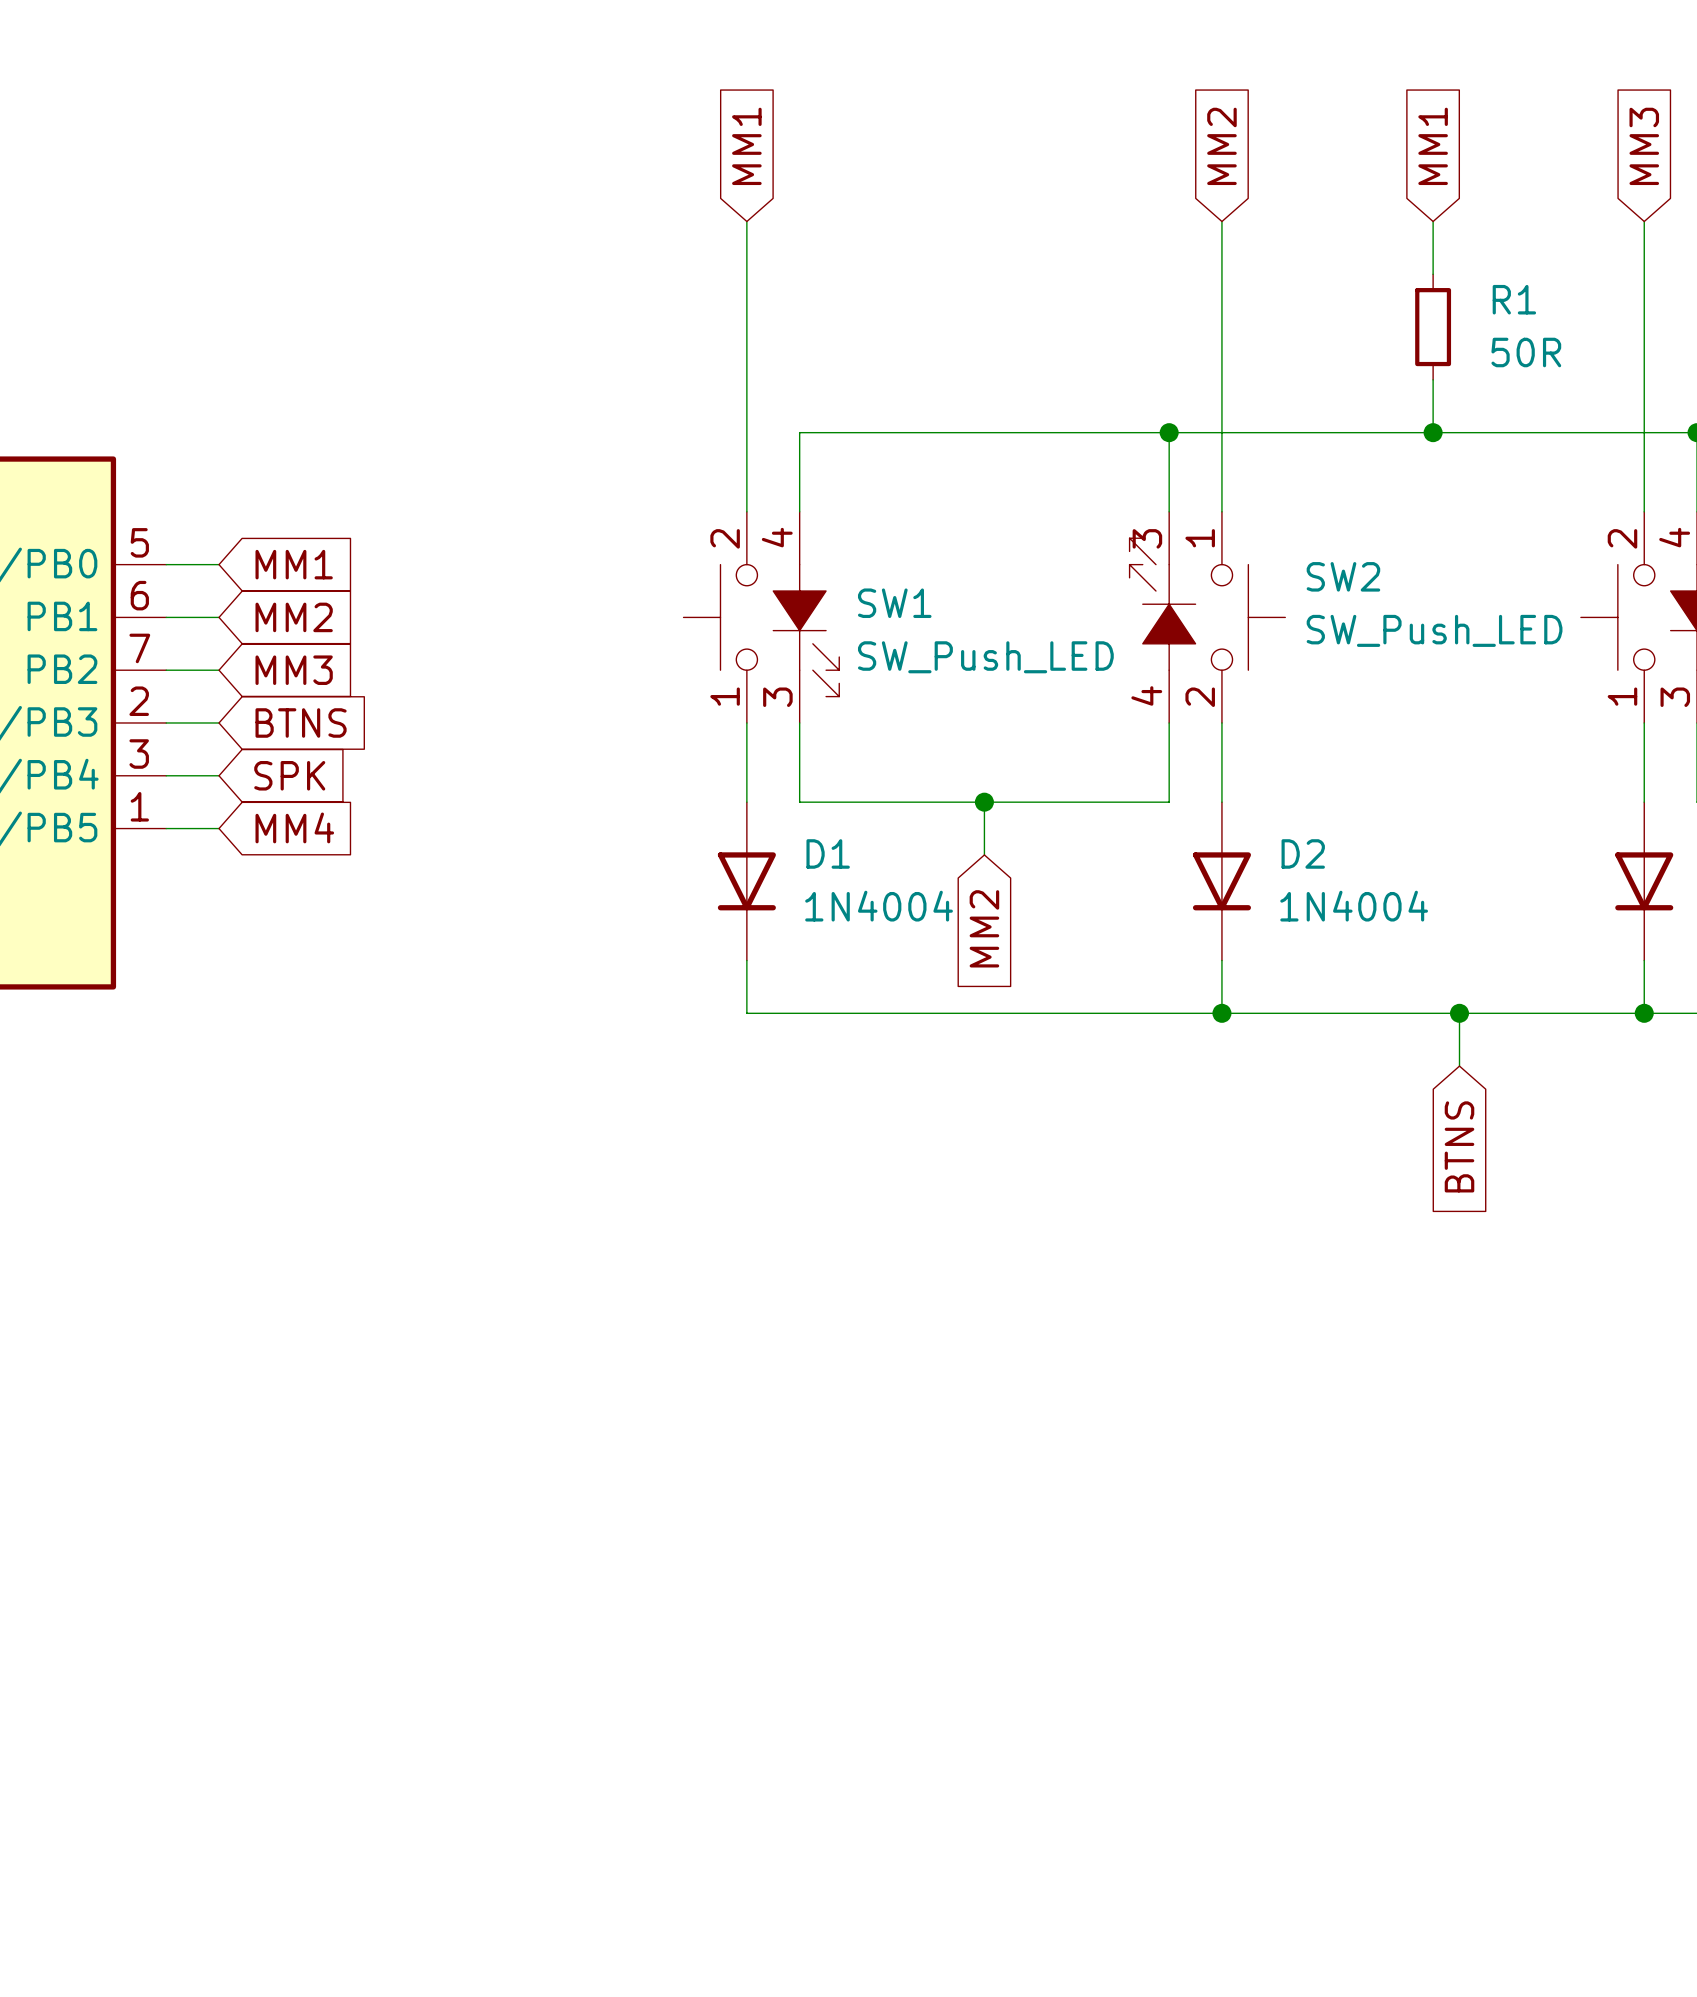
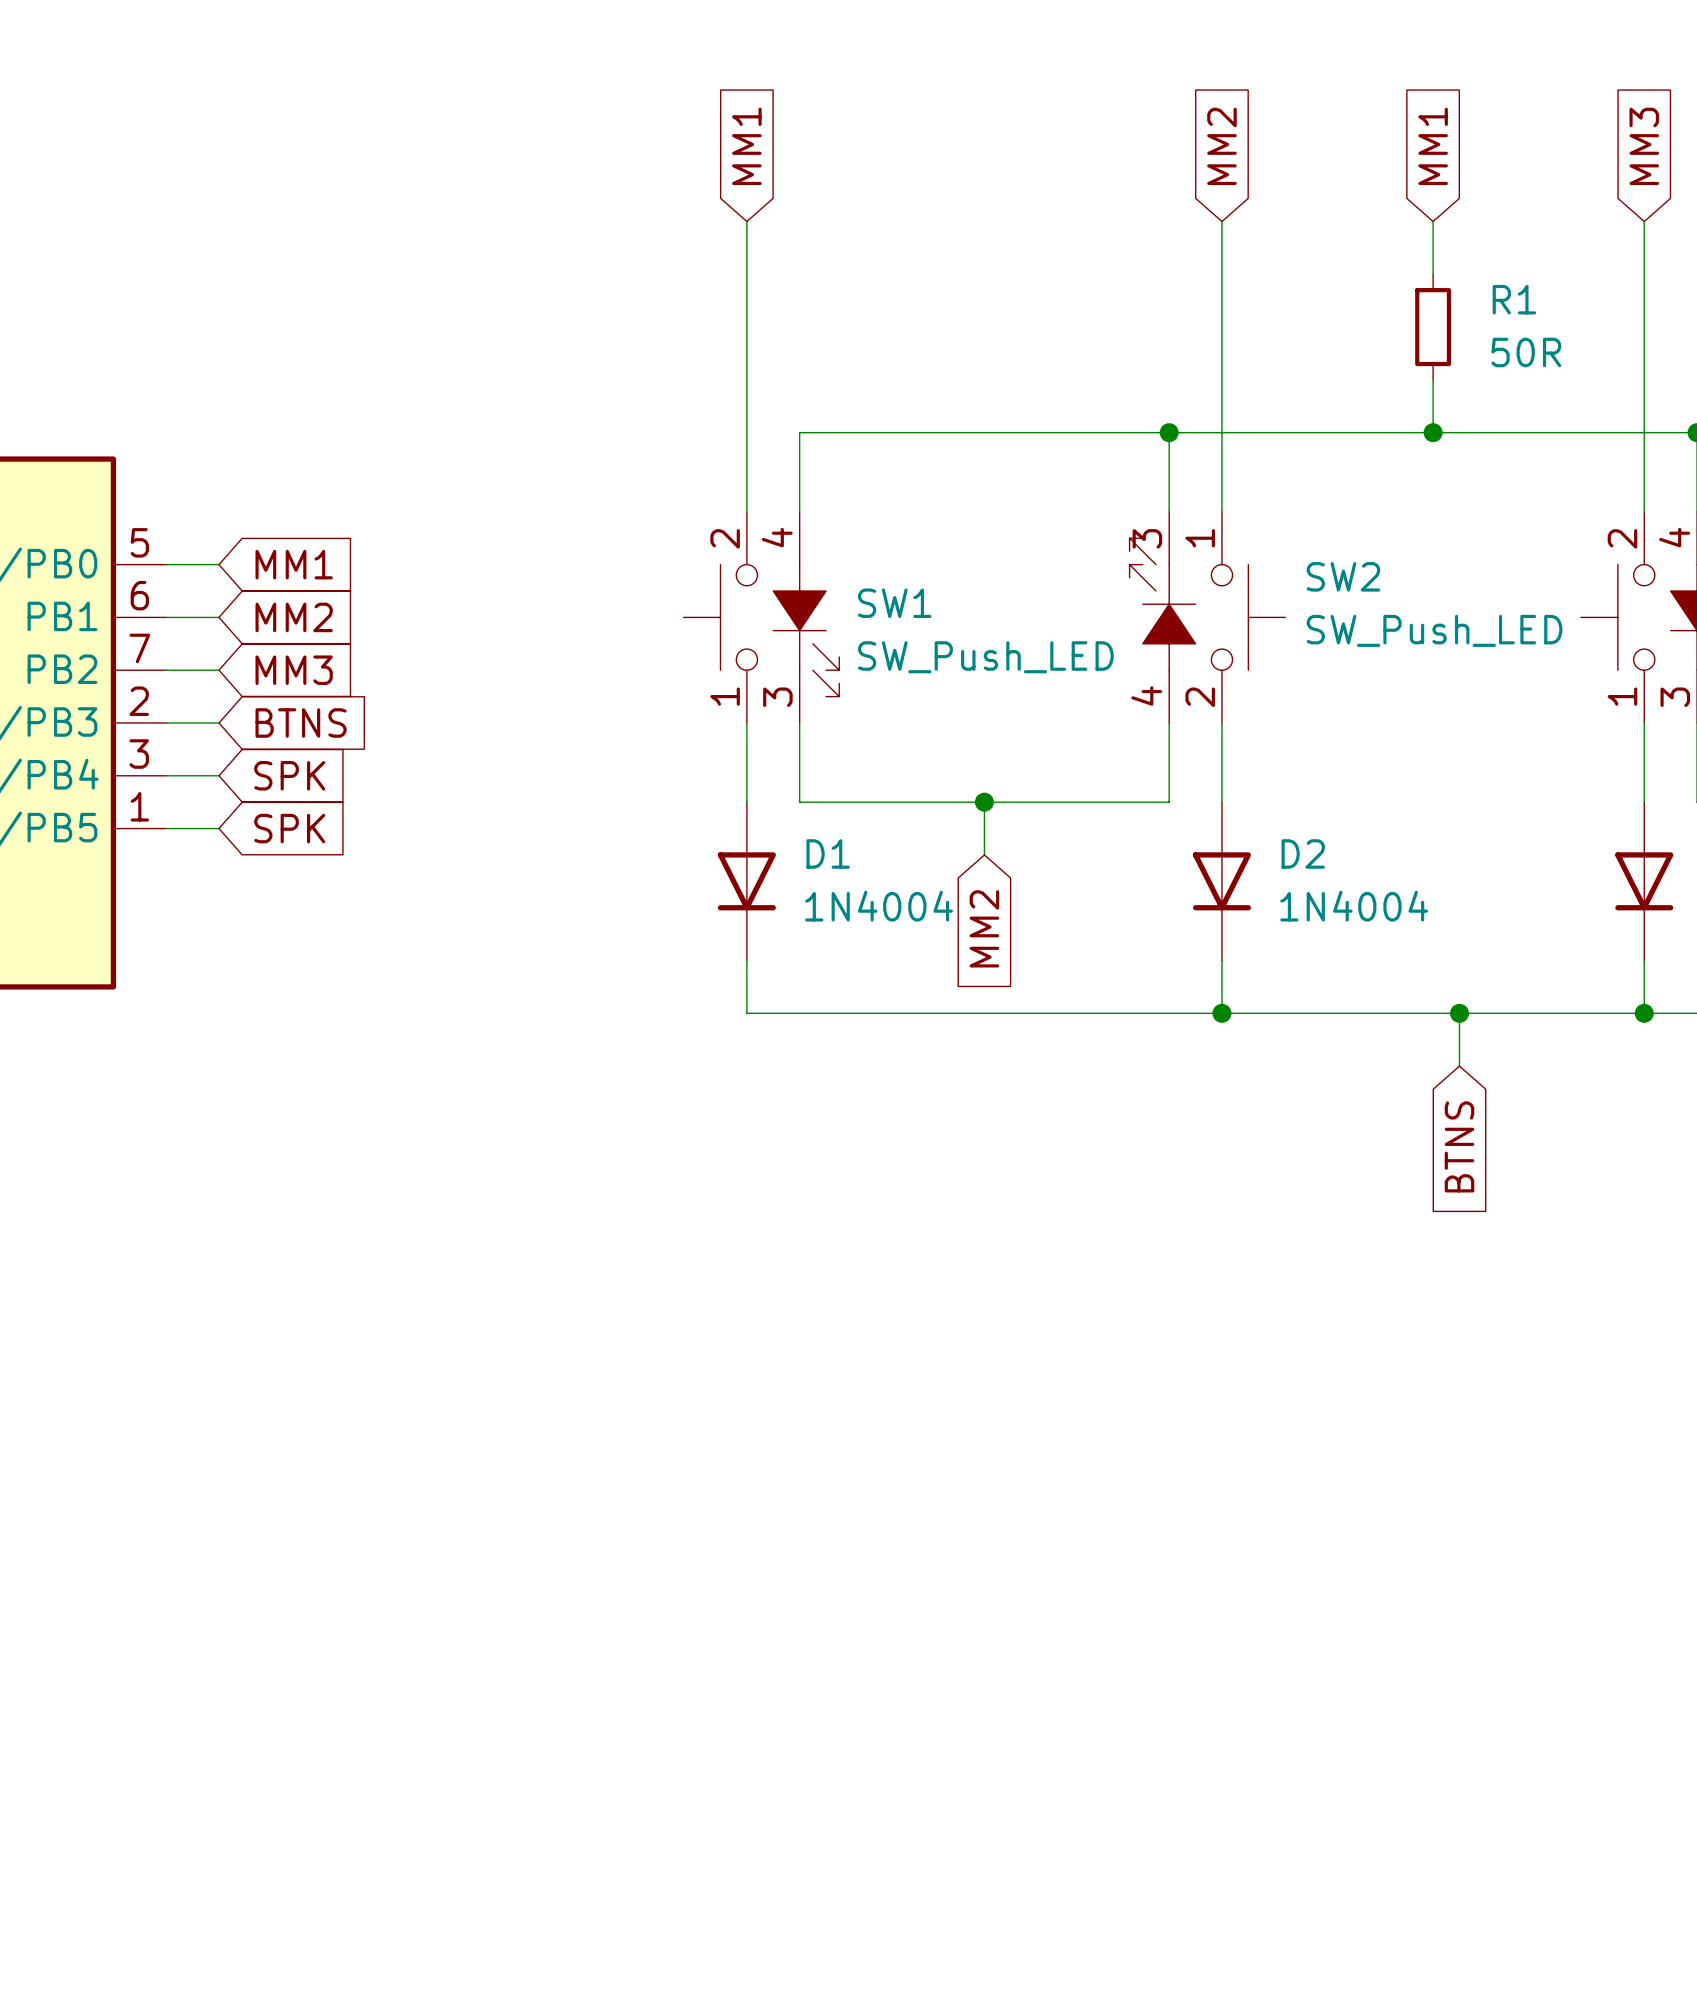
global label: MM4 (294, 827) -> SPK (289, 828)

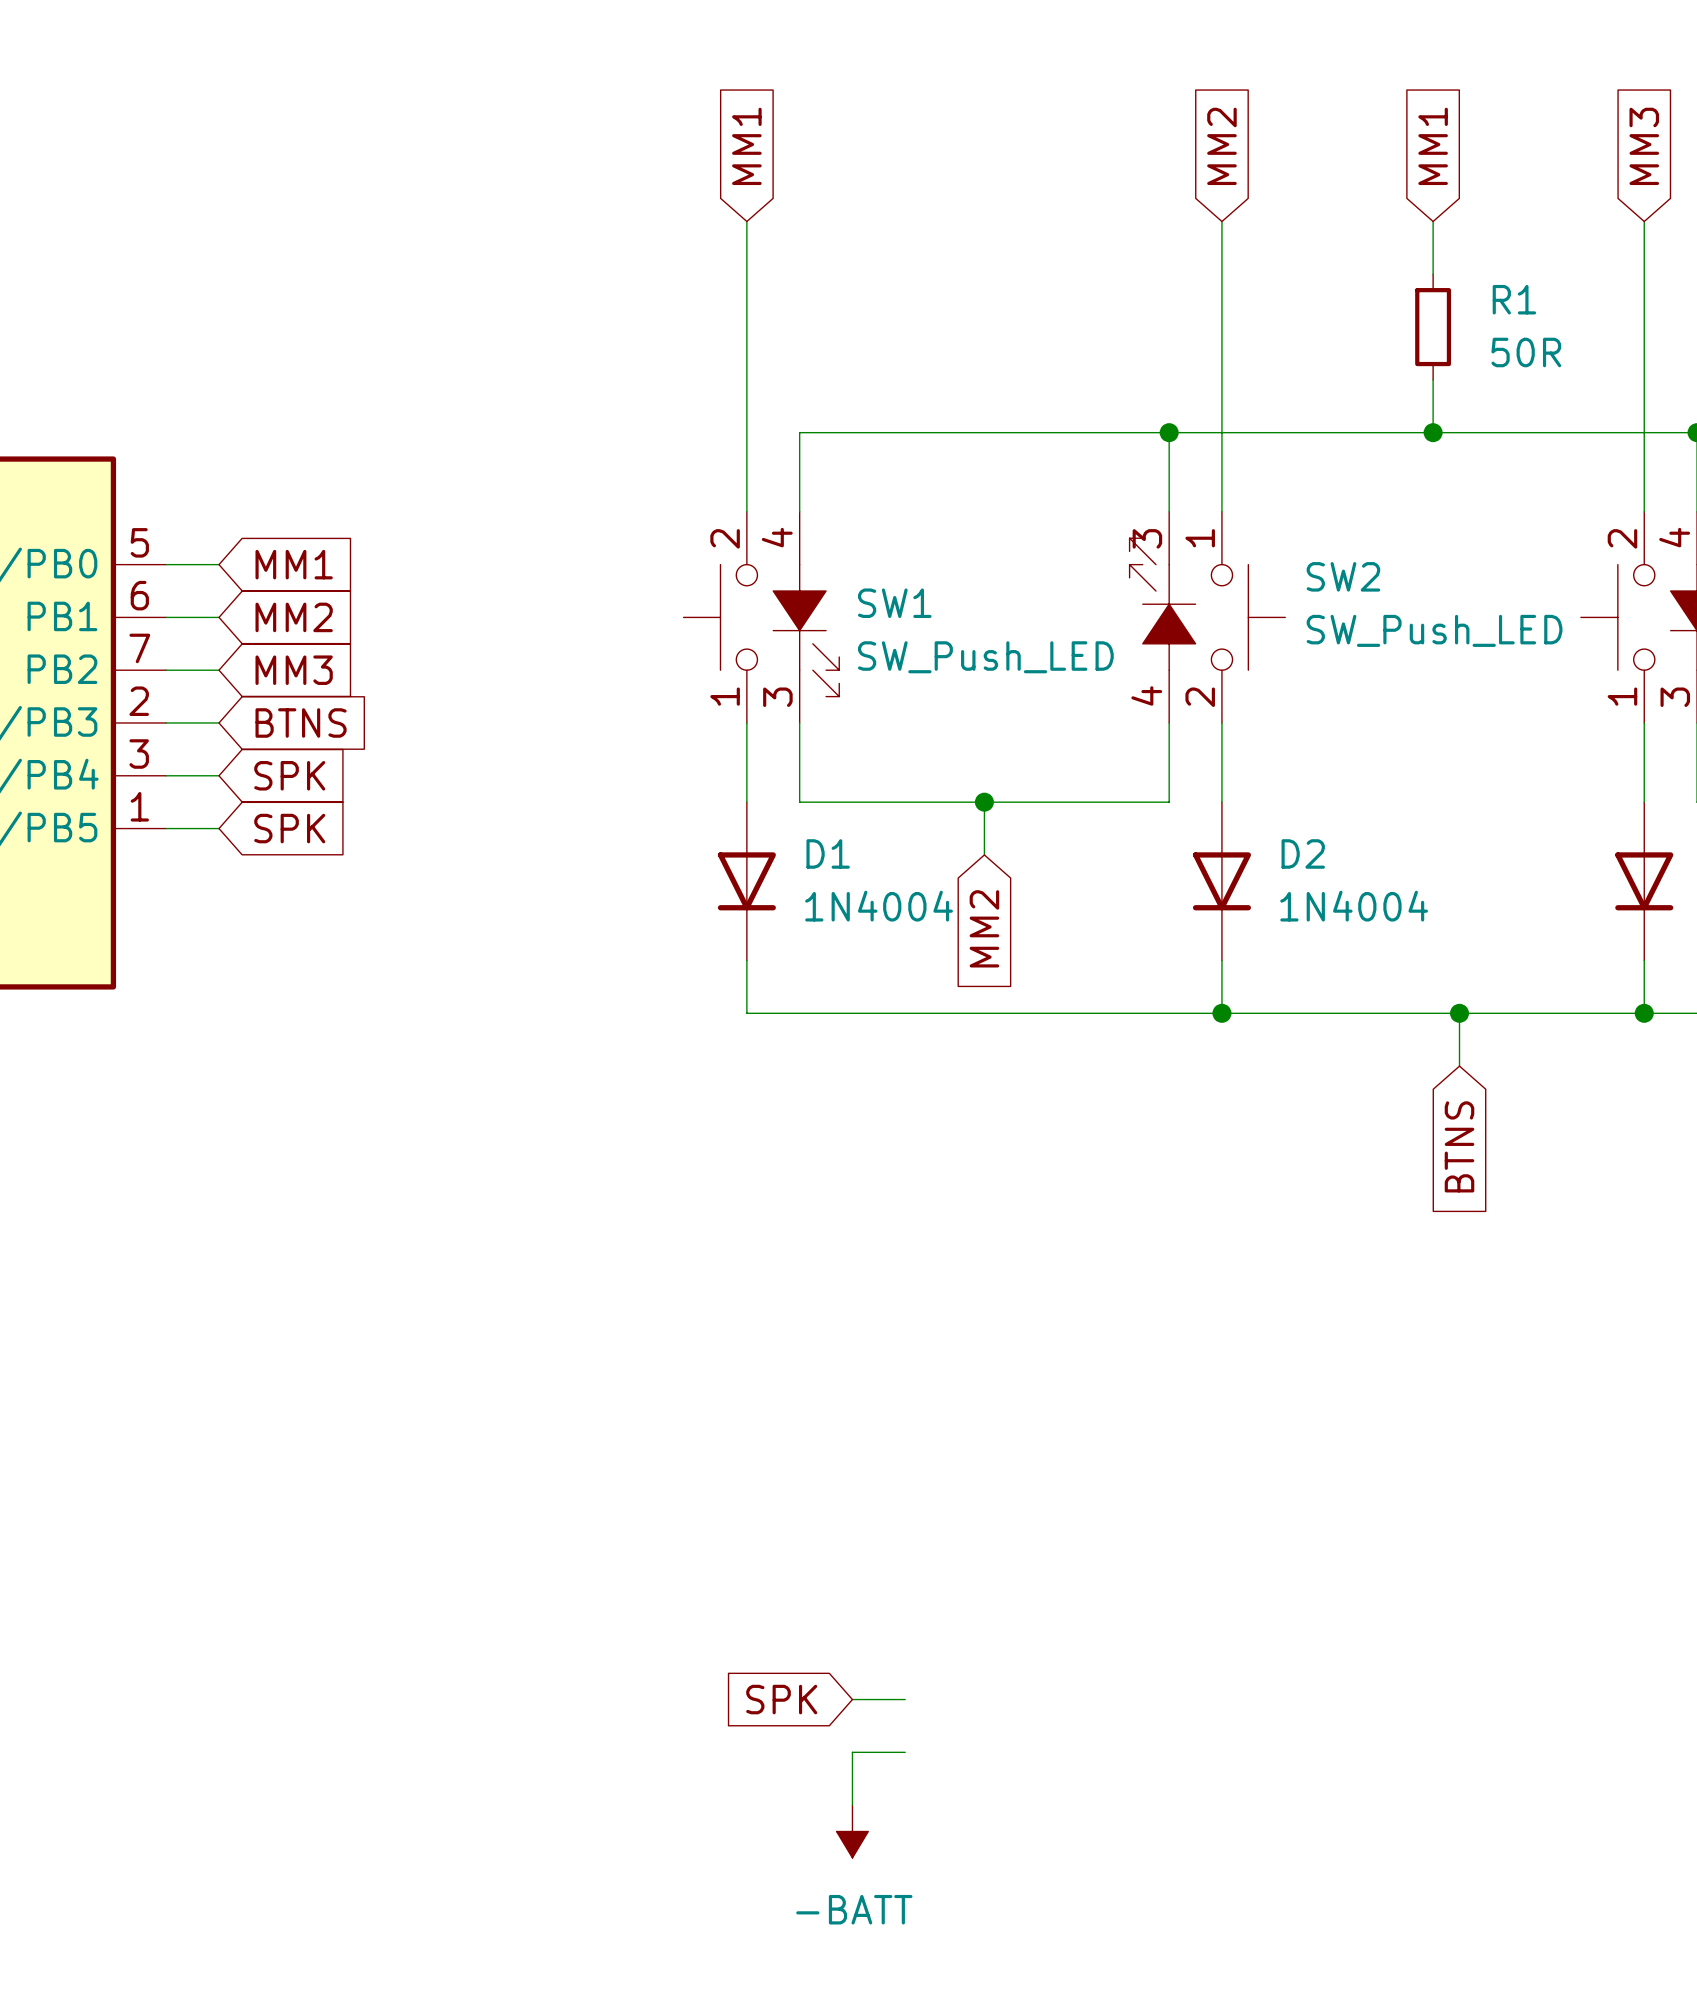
global label: none -> SPK (781, 1699)
wire: none -> (852, 1699) (905, 1699)
wire: none -> (905, 1752) (852, 1752) (852, 1805)
power symbol: none -> -BATT (852, 1831)

